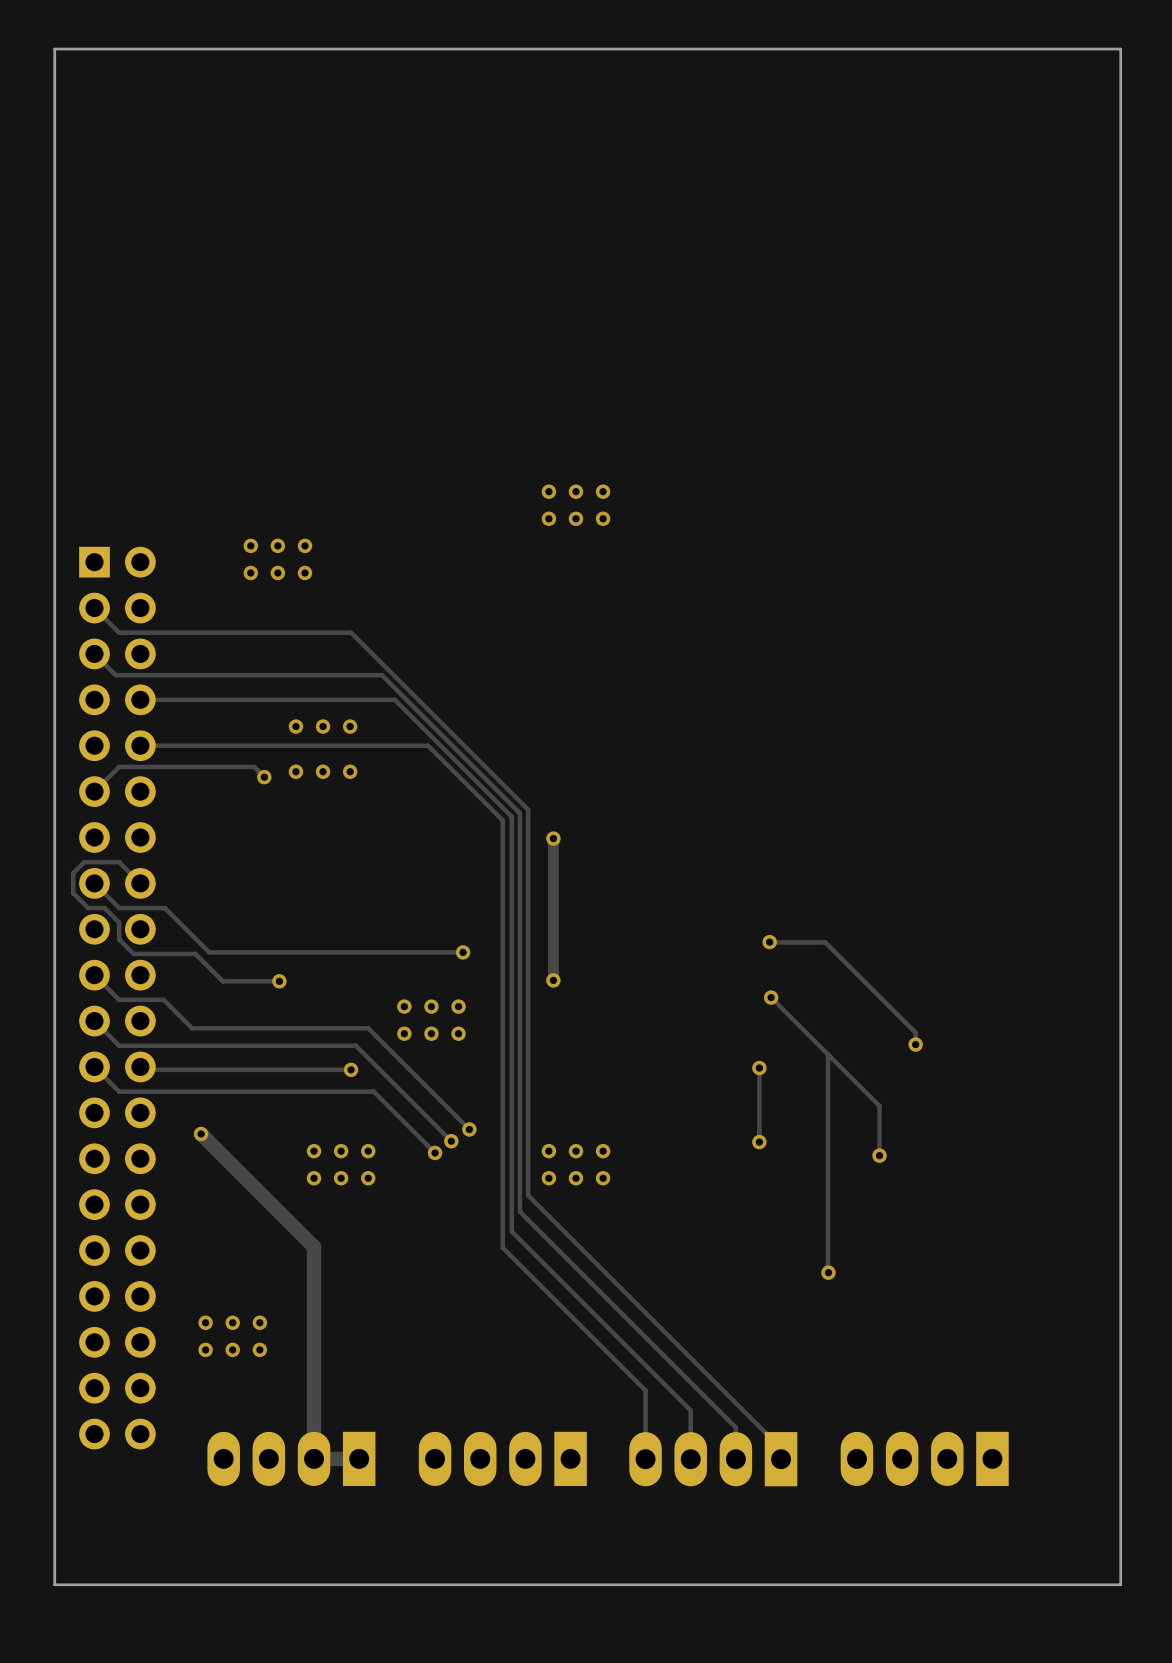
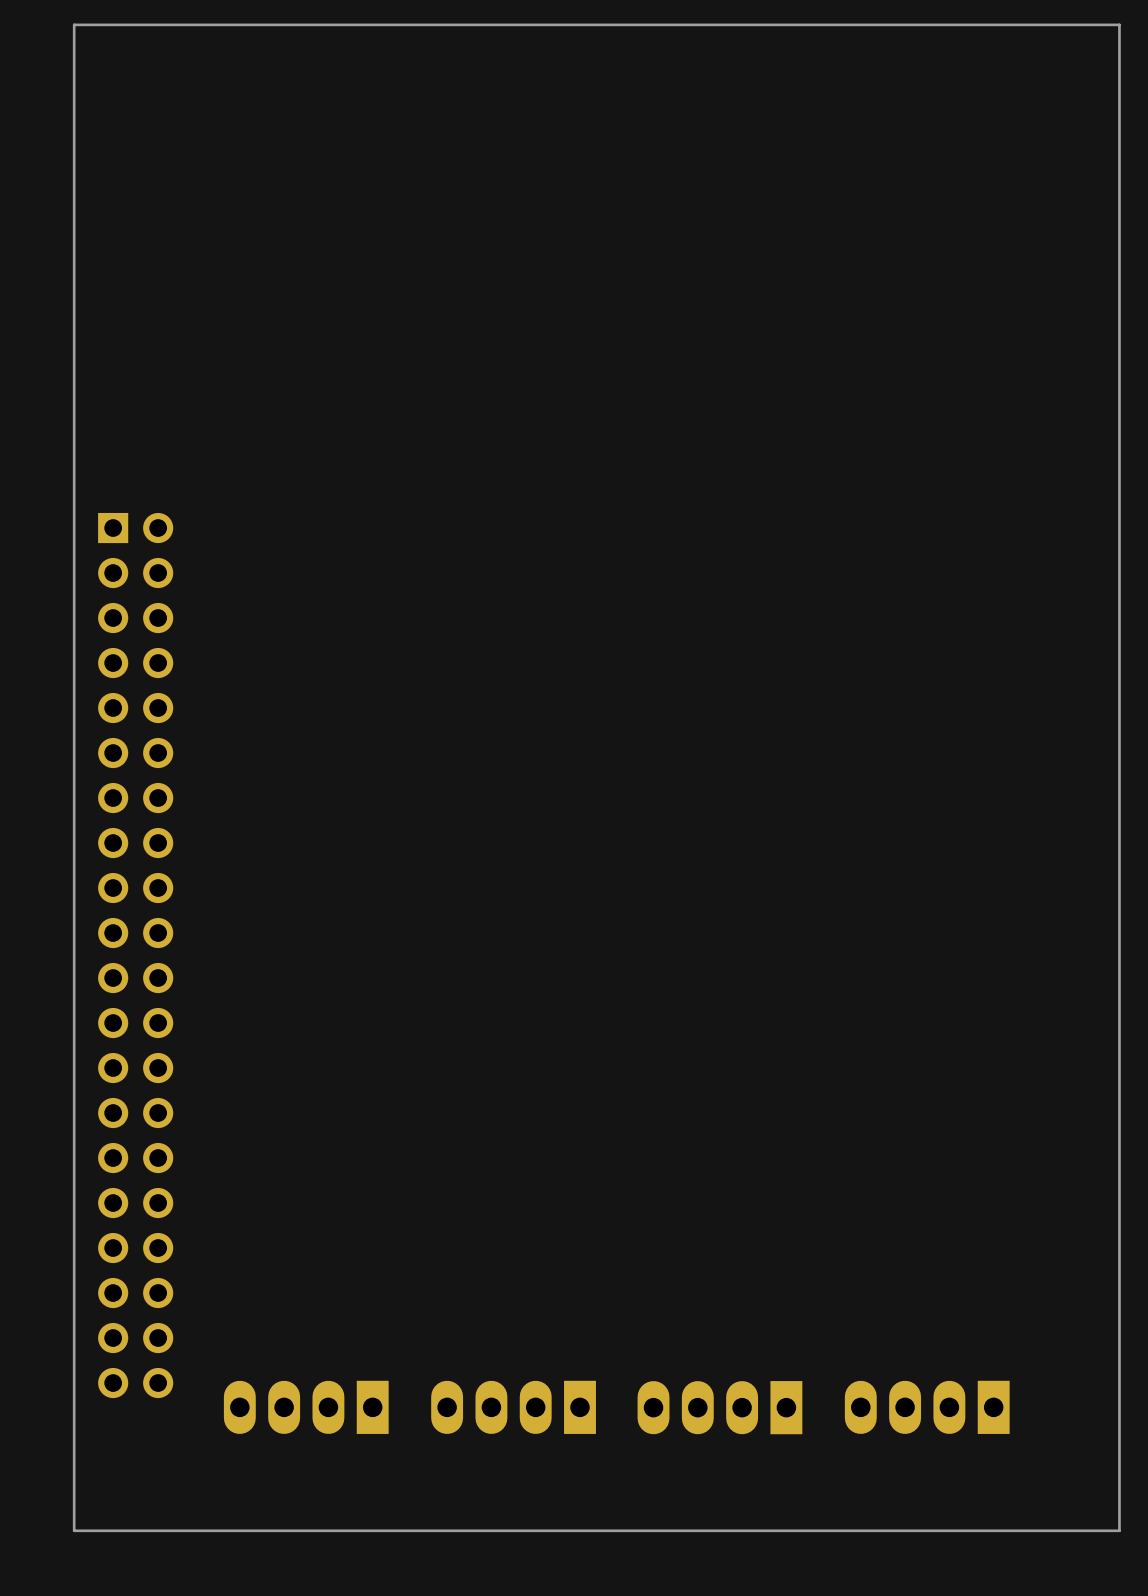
via: (548, 491) -> none
via: (575, 491) -> none
via: (603, 491) -> none
via: (548, 518) -> none
via: (575, 518) -> none
via: (603, 518) -> none
via: (250, 545) -> none
via: (277, 545) -> none
via: (304, 545) -> none
via: (250, 572) -> none
via: (277, 572) -> none
via: (304, 572) -> none
track: (94, 608) (119, 632) (351, 632) (528, 809) (528, 1195) (781, 1448) (781, 1459) -> none
track: (94, 653) (115, 675) (381, 675) (519, 813) (519, 1211) (735, 1427) (735, 1459) -> none
track: (140, 699) (394, 699) (511, 816) (511, 1231) (690, 1410) (690, 1459) -> none
via: (295, 726) -> none
via: (323, 726) -> none
via: (350, 726) -> none
track: (140, 745) (428, 745) (502, 820) (502, 1247) (645, 1390) (645, 1459) -> none
via: (295, 771) -> none
via: (323, 771) -> none
via: (350, 771) -> none
track: (264, 777) (254, 766) (119, 766) (94, 791) -> none
via: (264, 777) -> none
track: (553, 838) (553, 980) -> none
via: (553, 838) -> none
track: (94, 883) (119, 908) (164, 908) (209, 952) (463, 952) -> none
track: (140, 883) (119, 862) (84, 862) (73, 873) (73, 893) (88, 908) (104, 908) (119, 922) (119, 939) (133, 953) (195, 953) (222, 981) (279, 981) -> none
track: (769, 942) (825, 942) (915, 1032) (915, 1044) -> none
via: (769, 942) -> none
via: (463, 952) -> none
track: (94, 975) (119, 999) (163, 999) (192, 1028) (368, 1028) (469, 1129) -> none
via: (553, 980) -> none
via: (279, 981) -> none
track: (771, 997) (879, 1105) (879, 1155) -> none
via: (771, 997) -> none
via: (404, 1006) -> none
via: (431, 1006) -> none
via: (458, 1006) -> none
track: (94, 1021) (119, 1045) (355, 1045) (451, 1141) -> none
via: (404, 1033) -> none
via: (431, 1033) -> none
via: (458, 1033) -> none
via: (915, 1044) -> none
track: (828, 1054) (828, 1272) -> none
track: (94, 1066) (119, 1091) (373, 1091) (435, 1152) -> none
track: (140, 1066) (143, 1069) (351, 1069) -> none
track: (759, 1068) (759, 1142) -> none
via: (759, 1068) -> none
via: (351, 1069) -> none
via: (469, 1129) -> none
track: (201, 1133) (314, 1246) (314, 1458) (359, 1458) -> none
via: (201, 1133) -> none
via: (451, 1141) -> none
via: (759, 1142) -> none
via: (314, 1151) -> none
via: (341, 1151) -> none
via: (368, 1151) -> none
via: (548, 1151) -> none
via: (575, 1151) -> none
via: (603, 1151) -> none
via: (435, 1152) -> none
via: (879, 1155) -> none
via: (314, 1178) -> none
via: (341, 1178) -> none
via: (368, 1178) -> none
via: (548, 1178) -> none
via: (575, 1178) -> none
via: (603, 1178) -> none
via: (828, 1272) -> none
via: (205, 1322) -> none
via: (232, 1322) -> none
via: (259, 1322) -> none
via: (205, 1349) -> none
via: (232, 1349) -> none
via: (259, 1349) -> none

